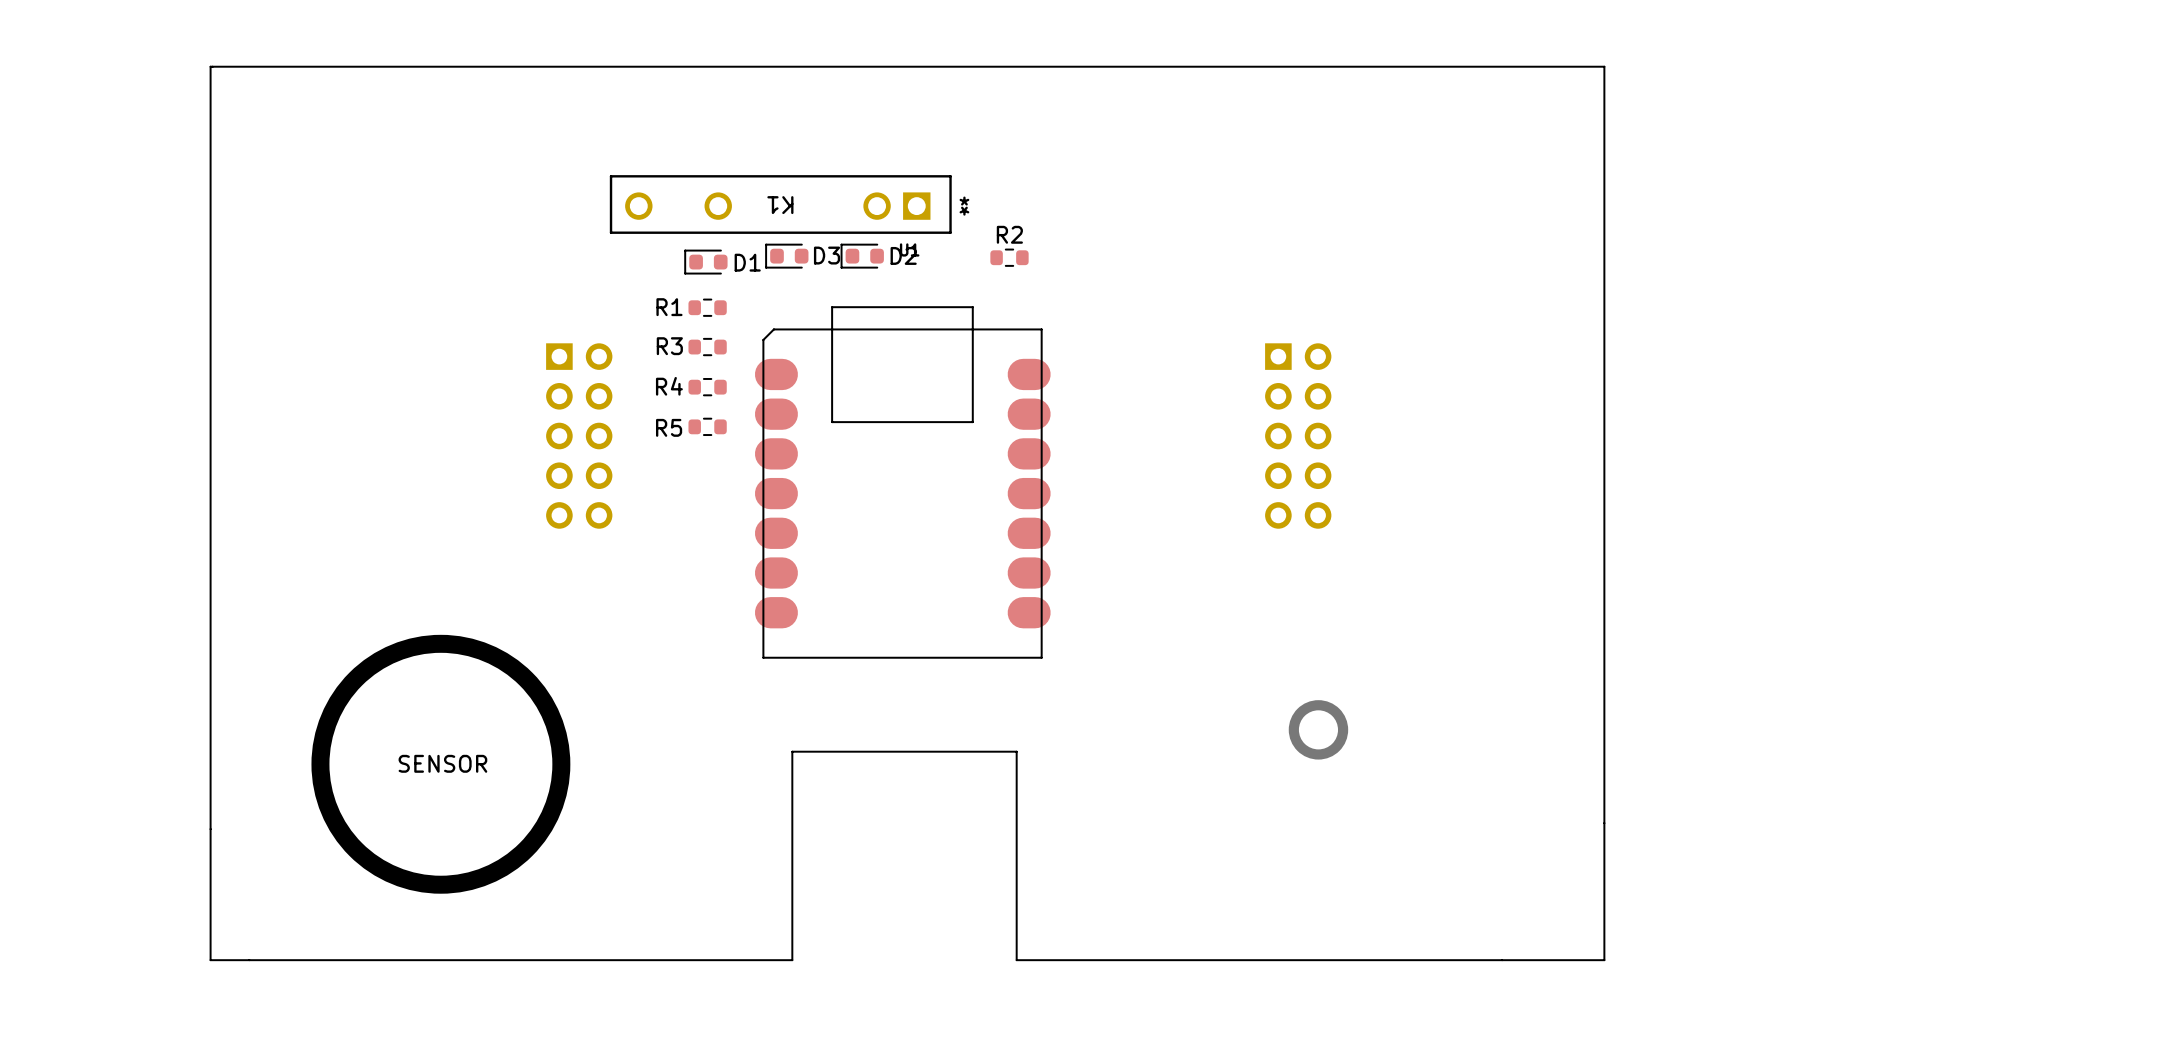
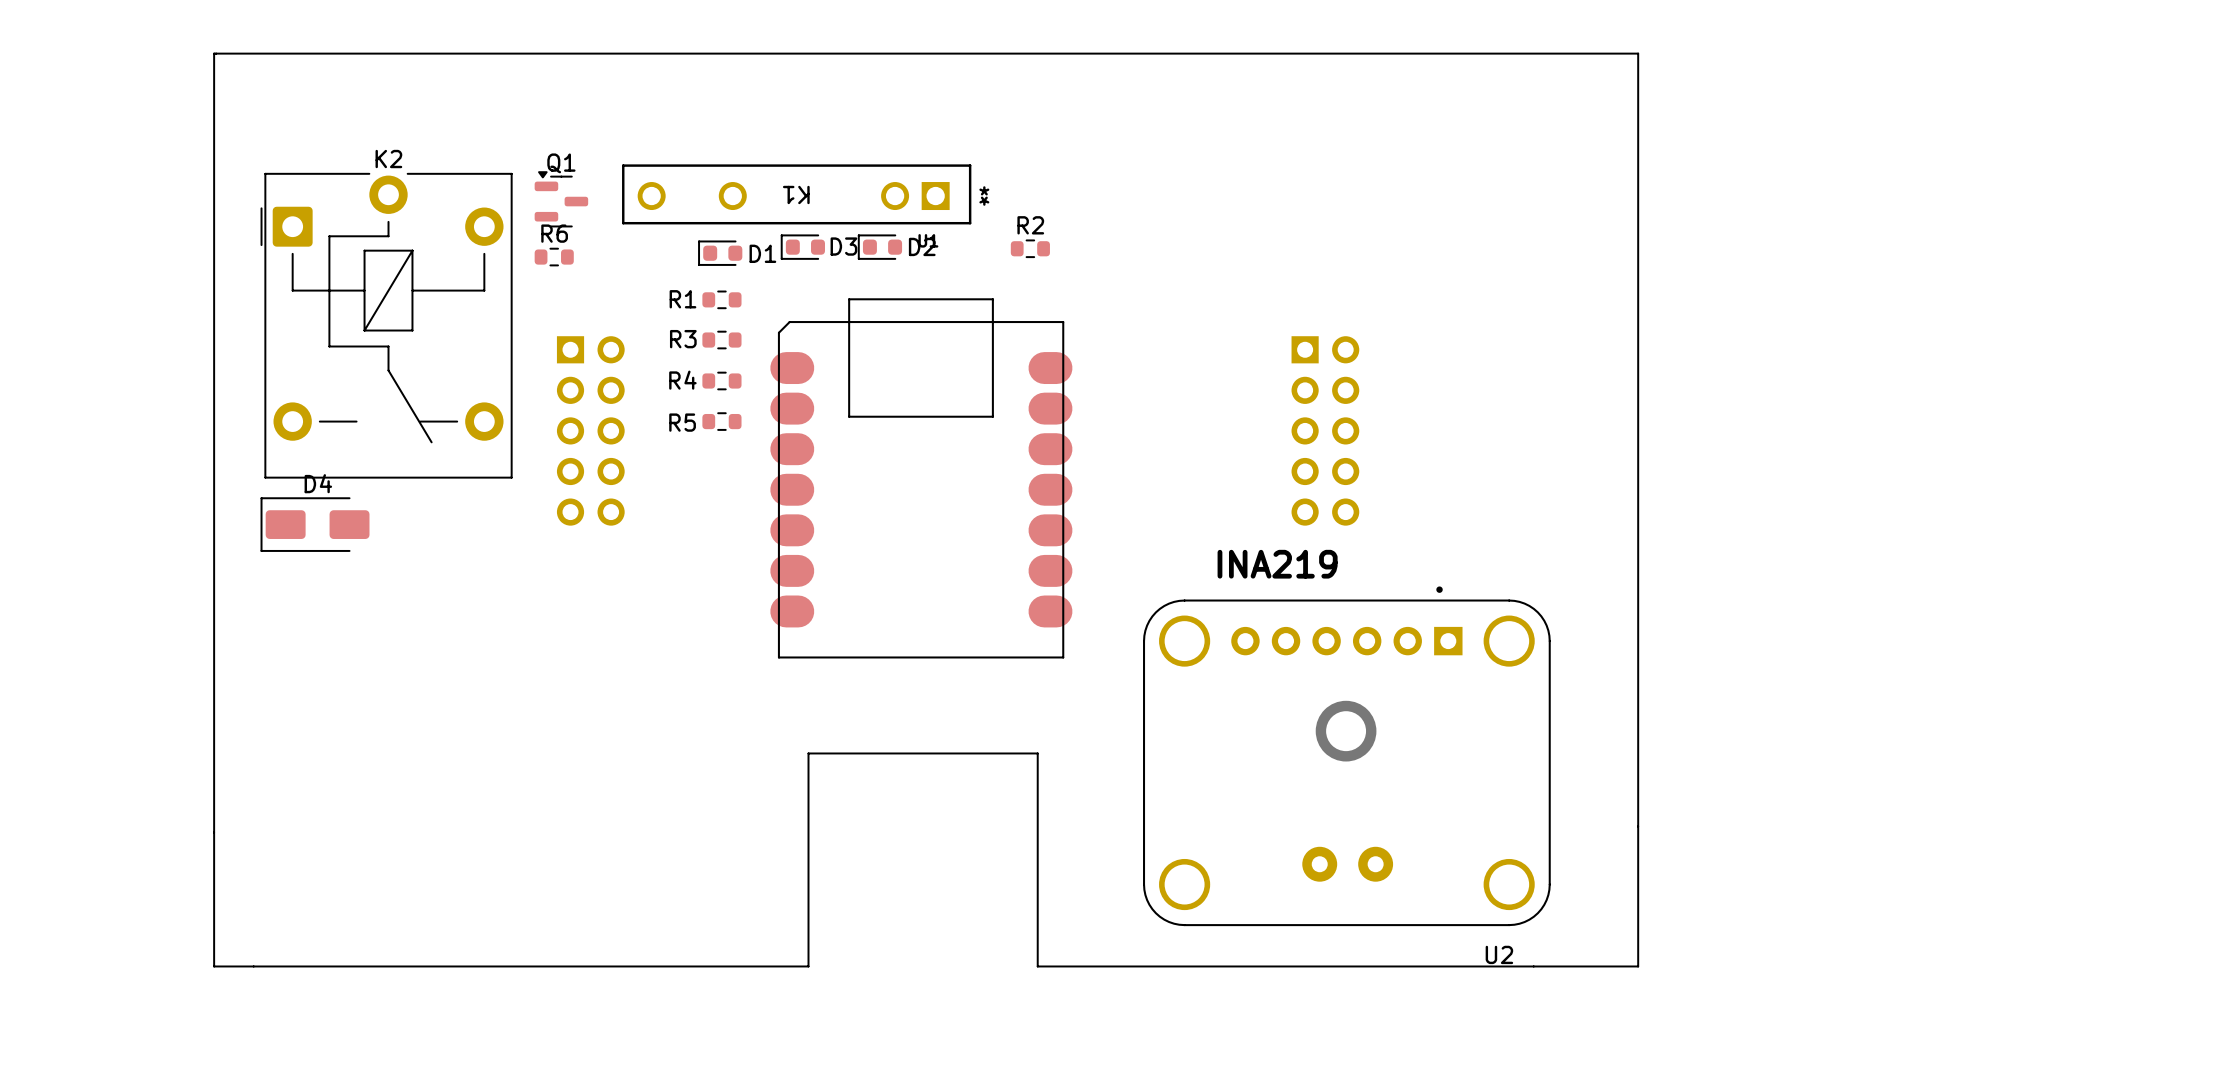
Q1: none -> (561, 199)
R6: none -> (554, 257)
K2: none -> (386, 325)
D4: none -> (315, 524)
text: none -> INA219 (1277, 564)
drawing: [311, 634, 571, 894] -> none
U2: none -> (1346, 756)
text: SENSOR (442, 763) -> none

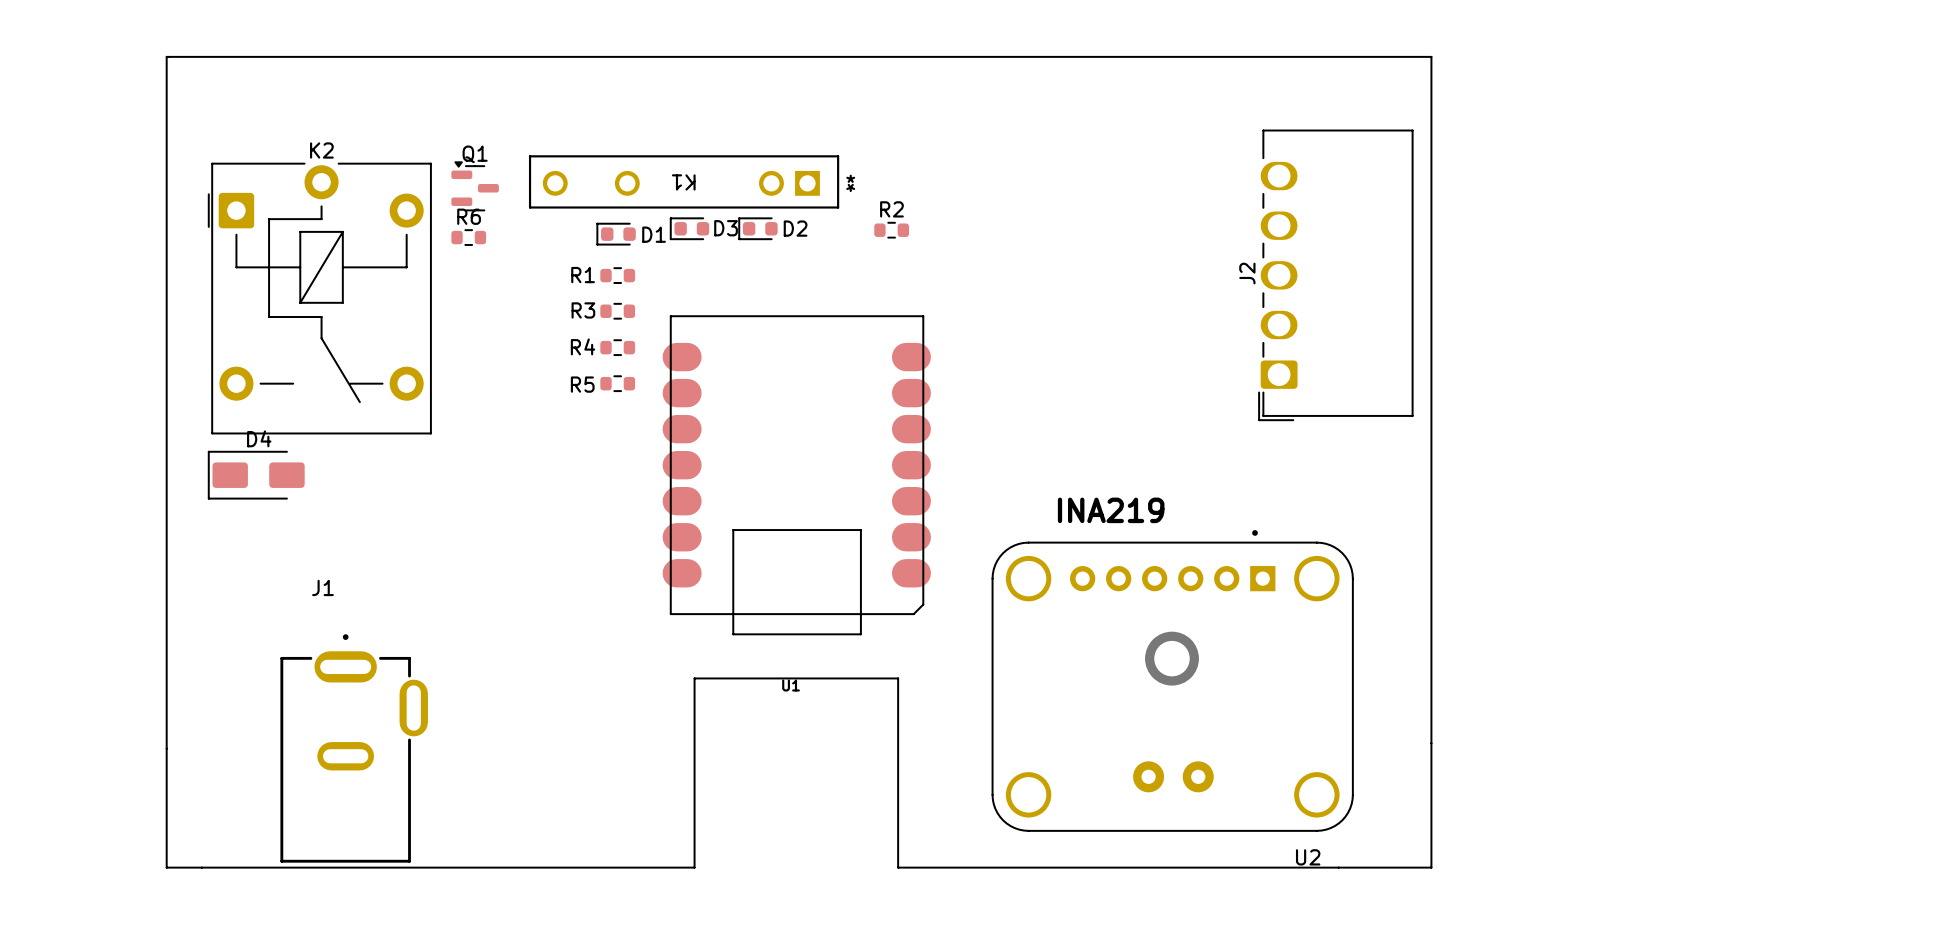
J2: none -> (1335, 275)
part: (590, 430) -> none
part: (1325, 430) -> none
U1 rotation: 0° (921, 478) -> 180° (796, 475)
J1: none -> (354, 748)

